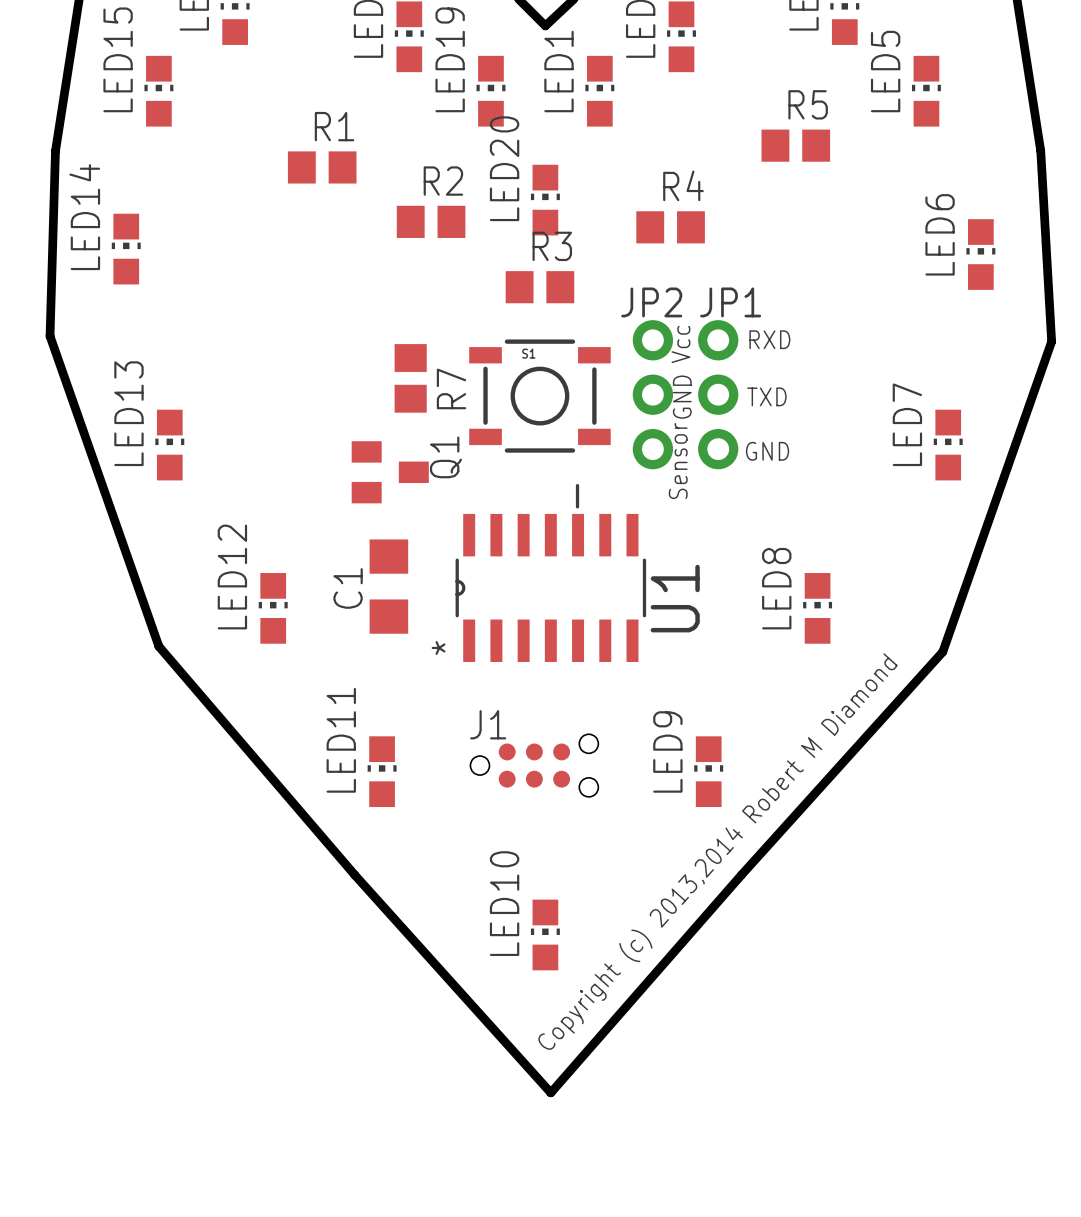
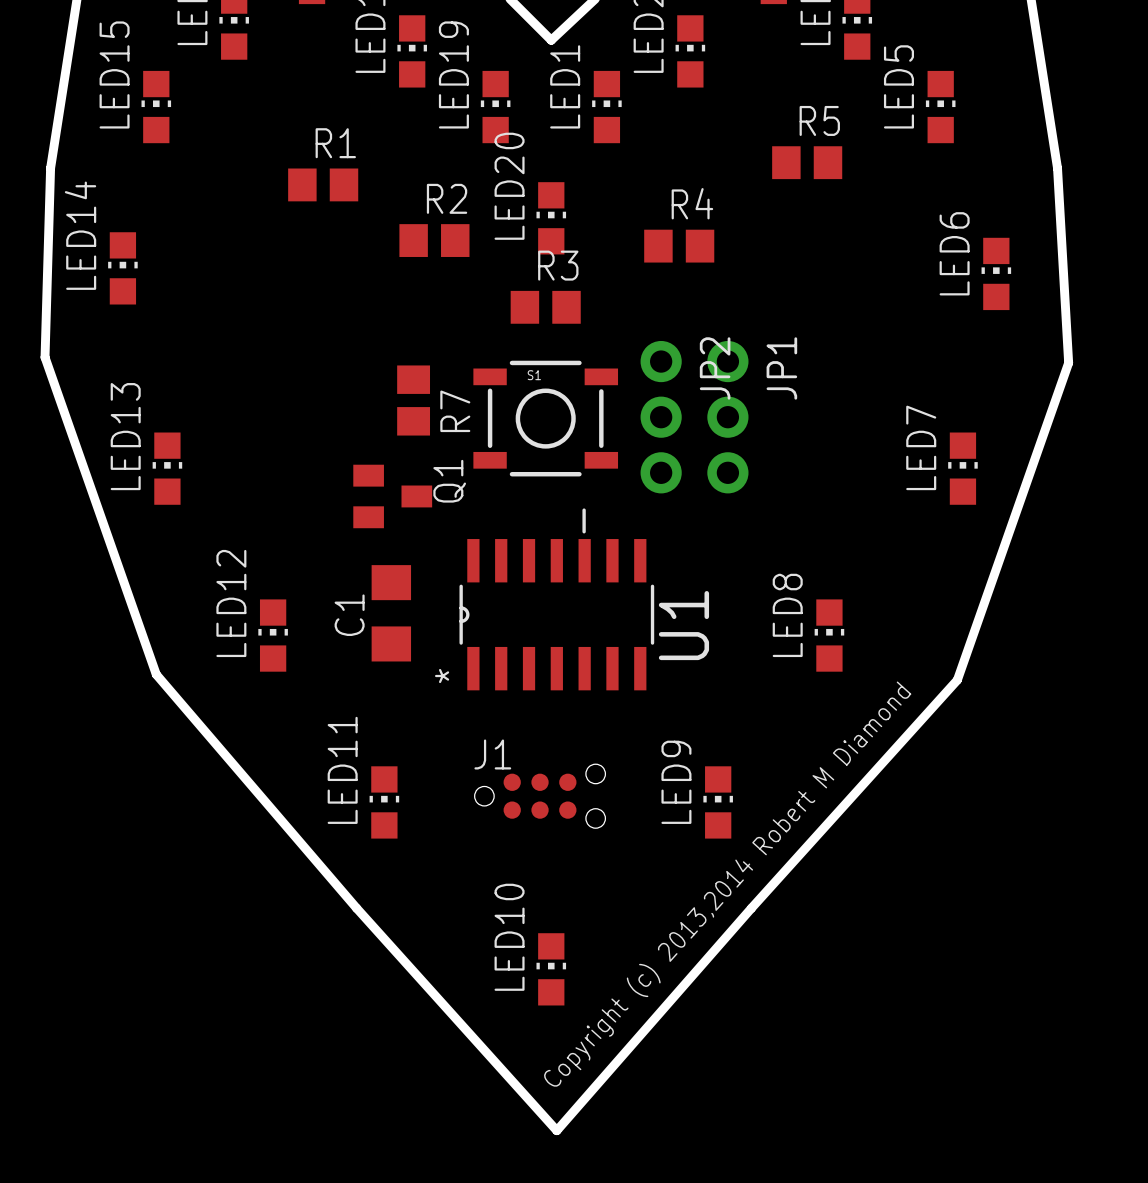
JP2 name rotation: 0° (651, 302) -> 90° counterclockwise (715, 368)
JP1 name rotation: 0° (730, 302) -> 90° counterclockwise (781, 368)
text: RXD (769, 339) -> none
text: Vcc (680, 344) -> none
text: TXD (766, 396) -> none
text: GND (682, 397) -> none
text: GND (767, 451) -> none
text: Sensor (678, 460) -> none

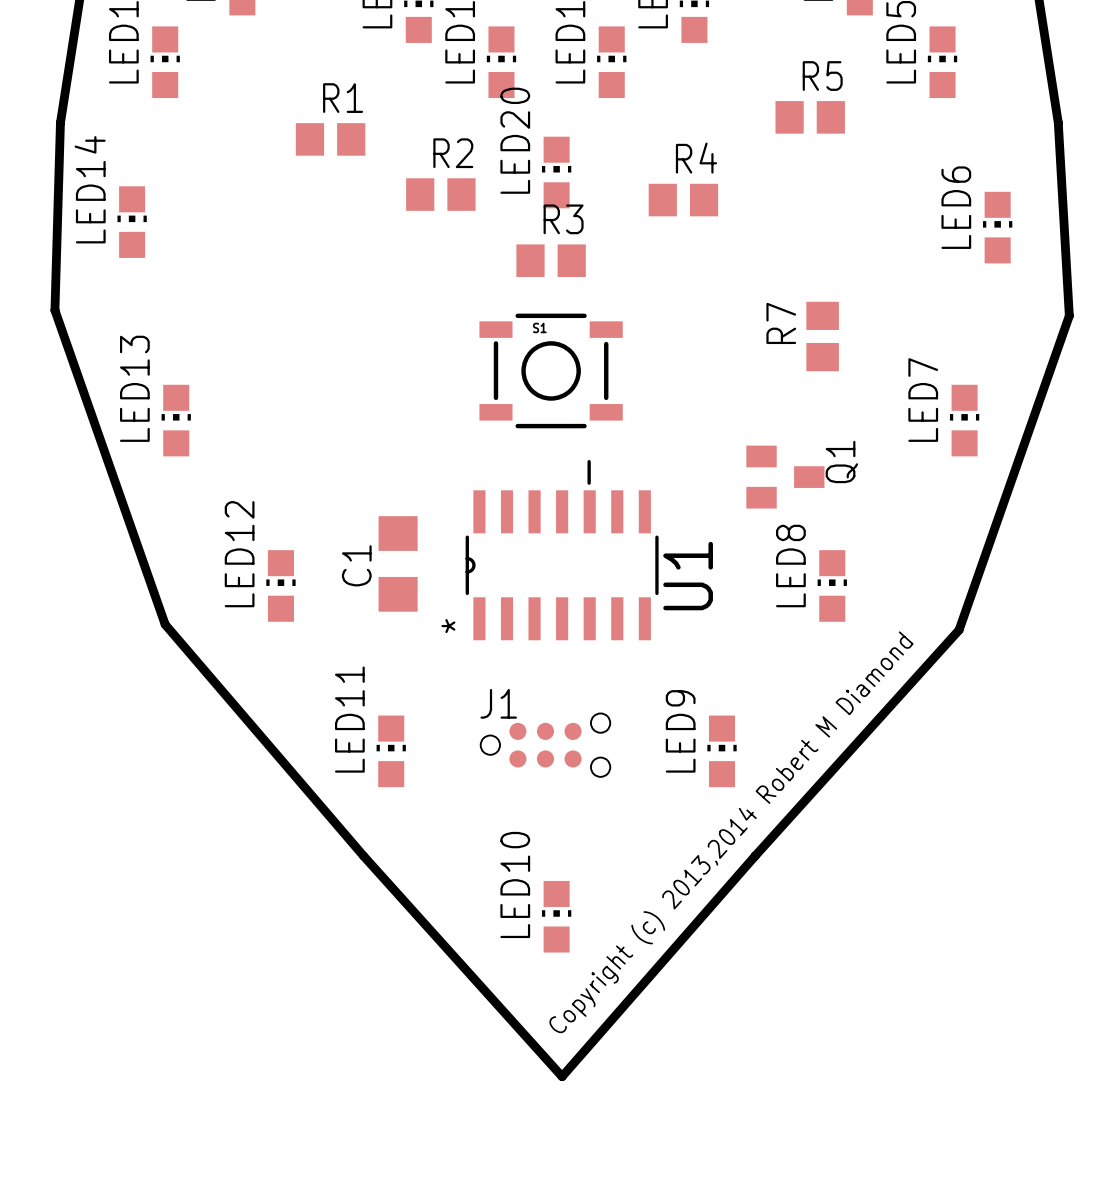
R7 position: (413, 400) -> (822, 336)
R7 name position: R7 (455, 411) -> R7 (781, 323)
JP2: (661, 417) -> none
JP1: (727, 417) -> none
Q1 position: (392, 496) -> (785, 477)

